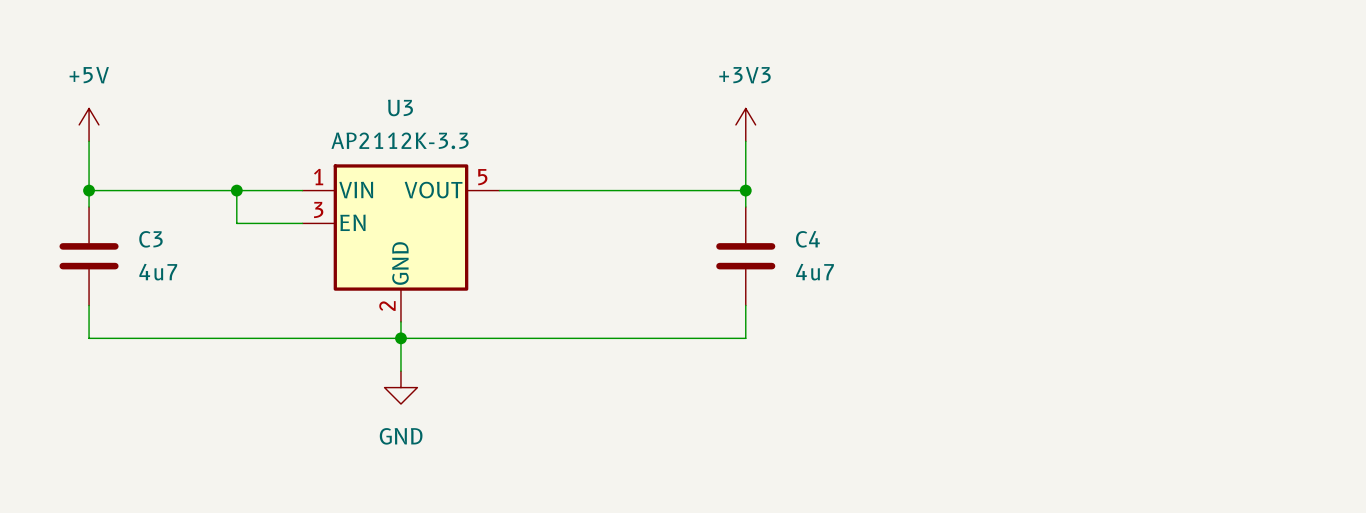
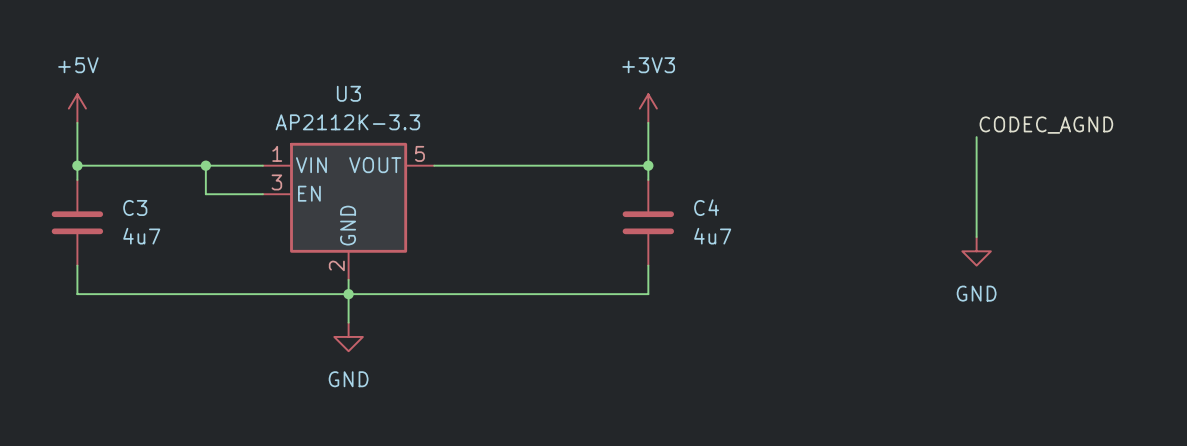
label: none -> CODEC_AGND (1046, 125)
wire: none -> (976, 137) (976, 237)
power symbol: none -> GND (976, 251)

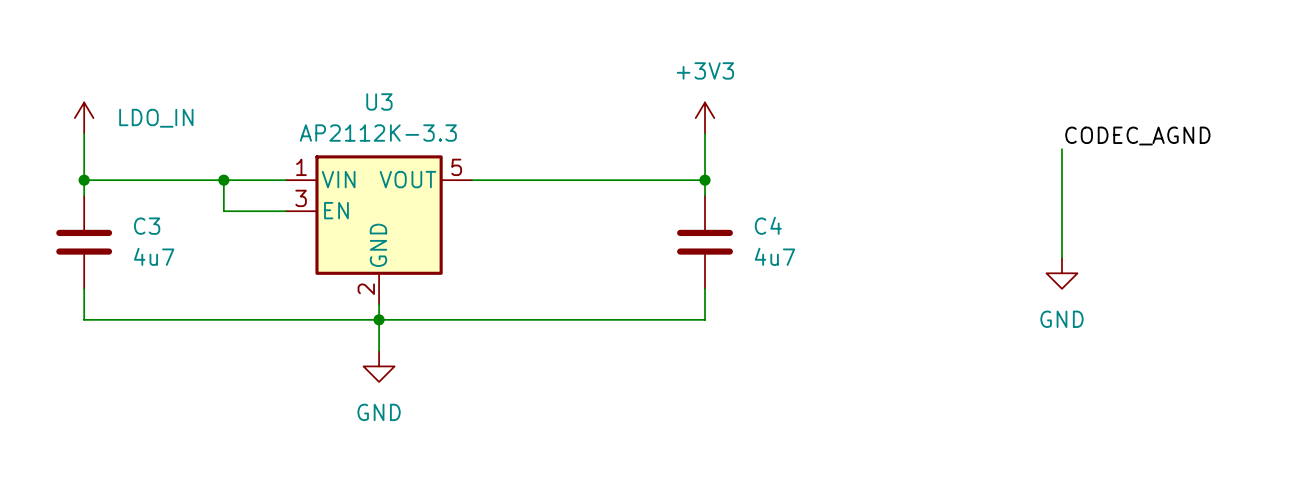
power symbol: +5V (77, 108) -> LDO_IN (84, 118)

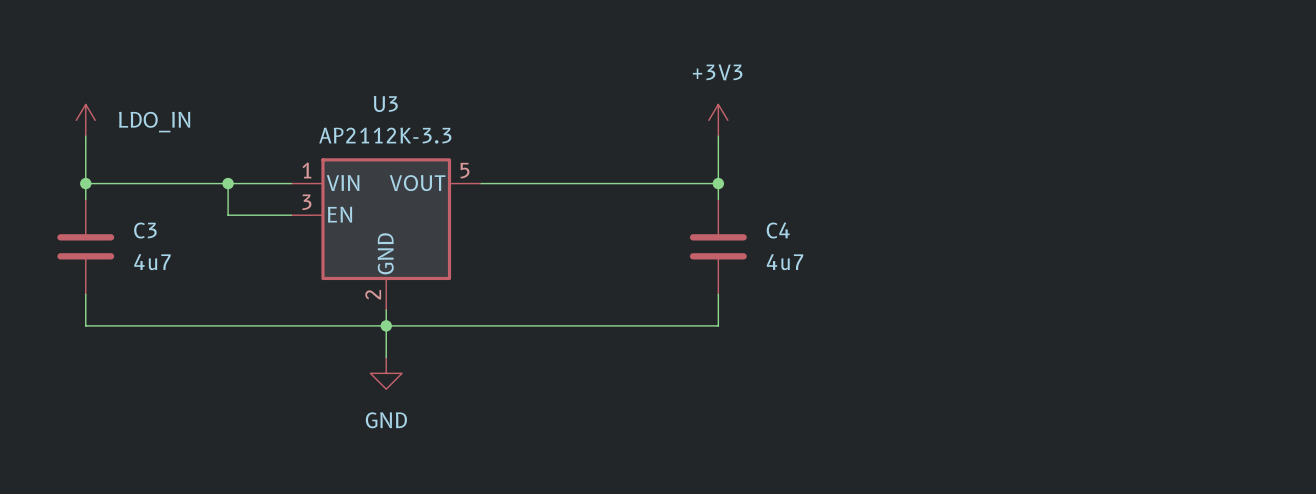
label: CODEC_AGND (1137, 136) -> none
wire: (1061, 149) (1061, 257) -> none
power symbol: GND (1061, 273) -> none

